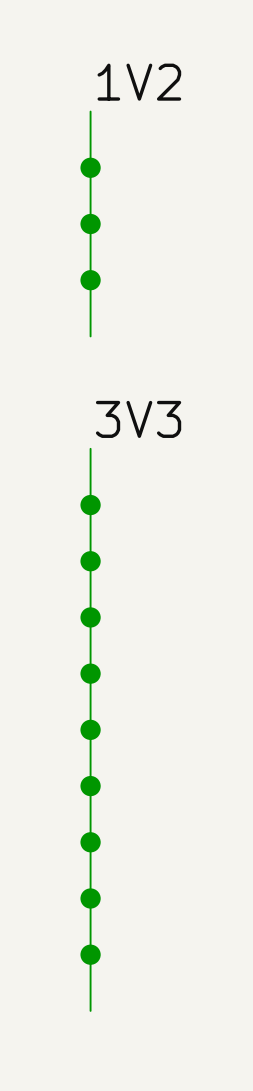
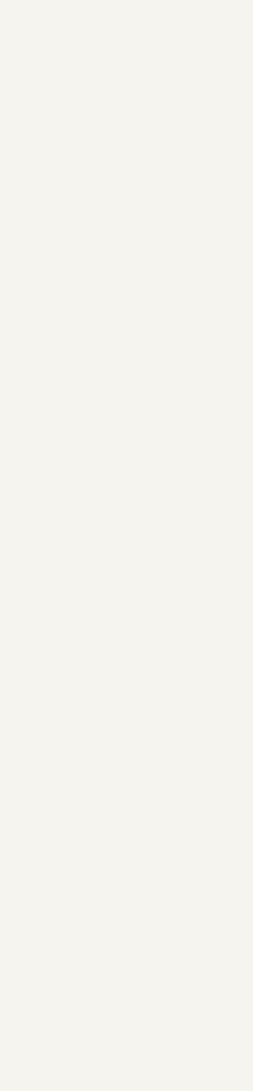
label: 1V2 (139, 82) -> none
wire: (90, 111) (90, 336) -> none
junction: (90, 167) -> none
junction: (90, 223) -> none
junction: (90, 280) -> none
label: 3V3 (138, 419) -> none
wire: (90, 448) (90, 1010) -> none
junction: (90, 505) -> none
junction: (90, 561) -> none
junction: (90, 617) -> none
junction: (90, 673) -> none
junction: (90, 729) -> none
junction: (90, 786) -> none
junction: (90, 842) -> none
junction: (90, 898) -> none
junction: (90, 954) -> none

